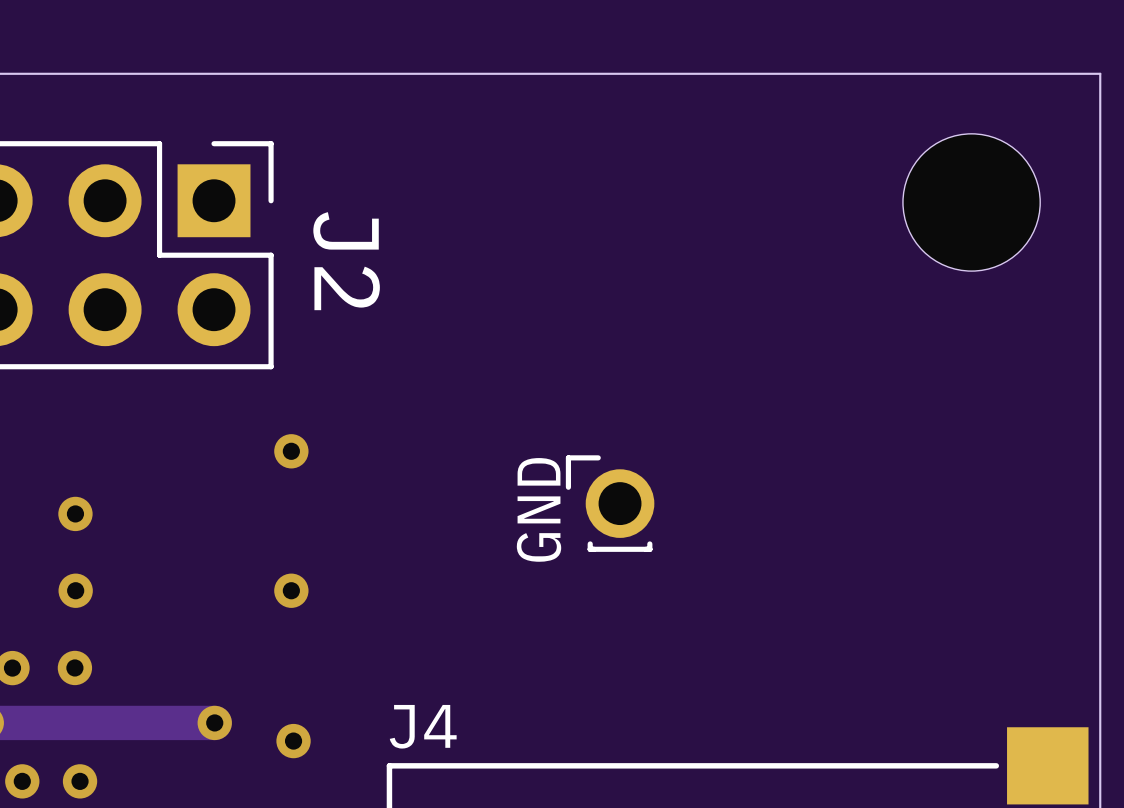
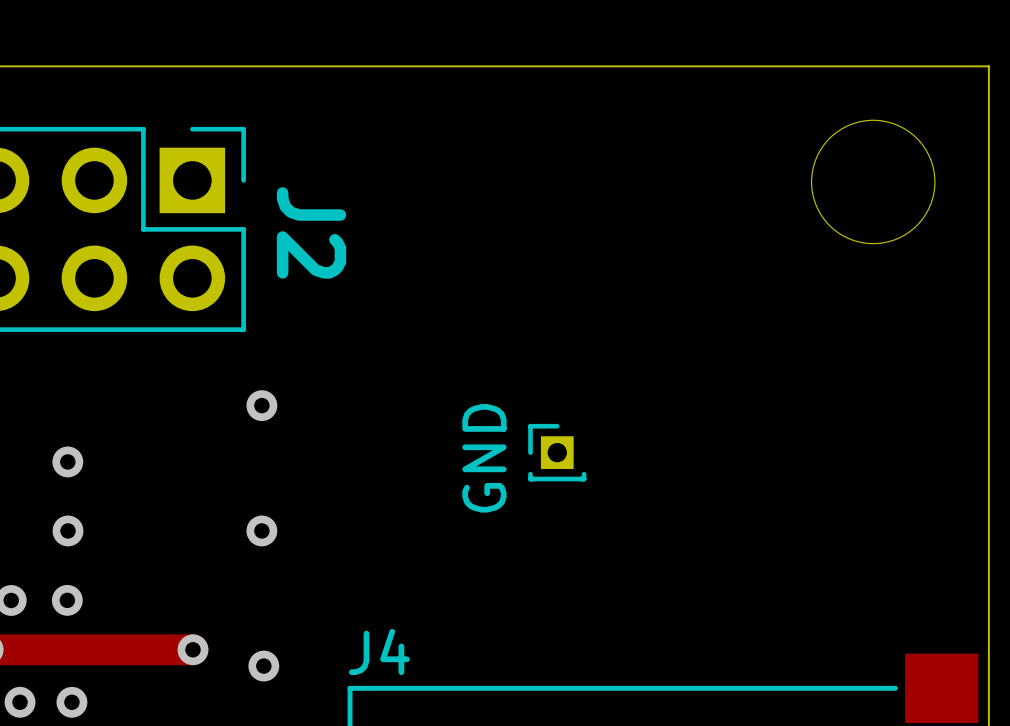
part footprint: [565, 455, 655, 552] -> [528, 423, 587, 482]

